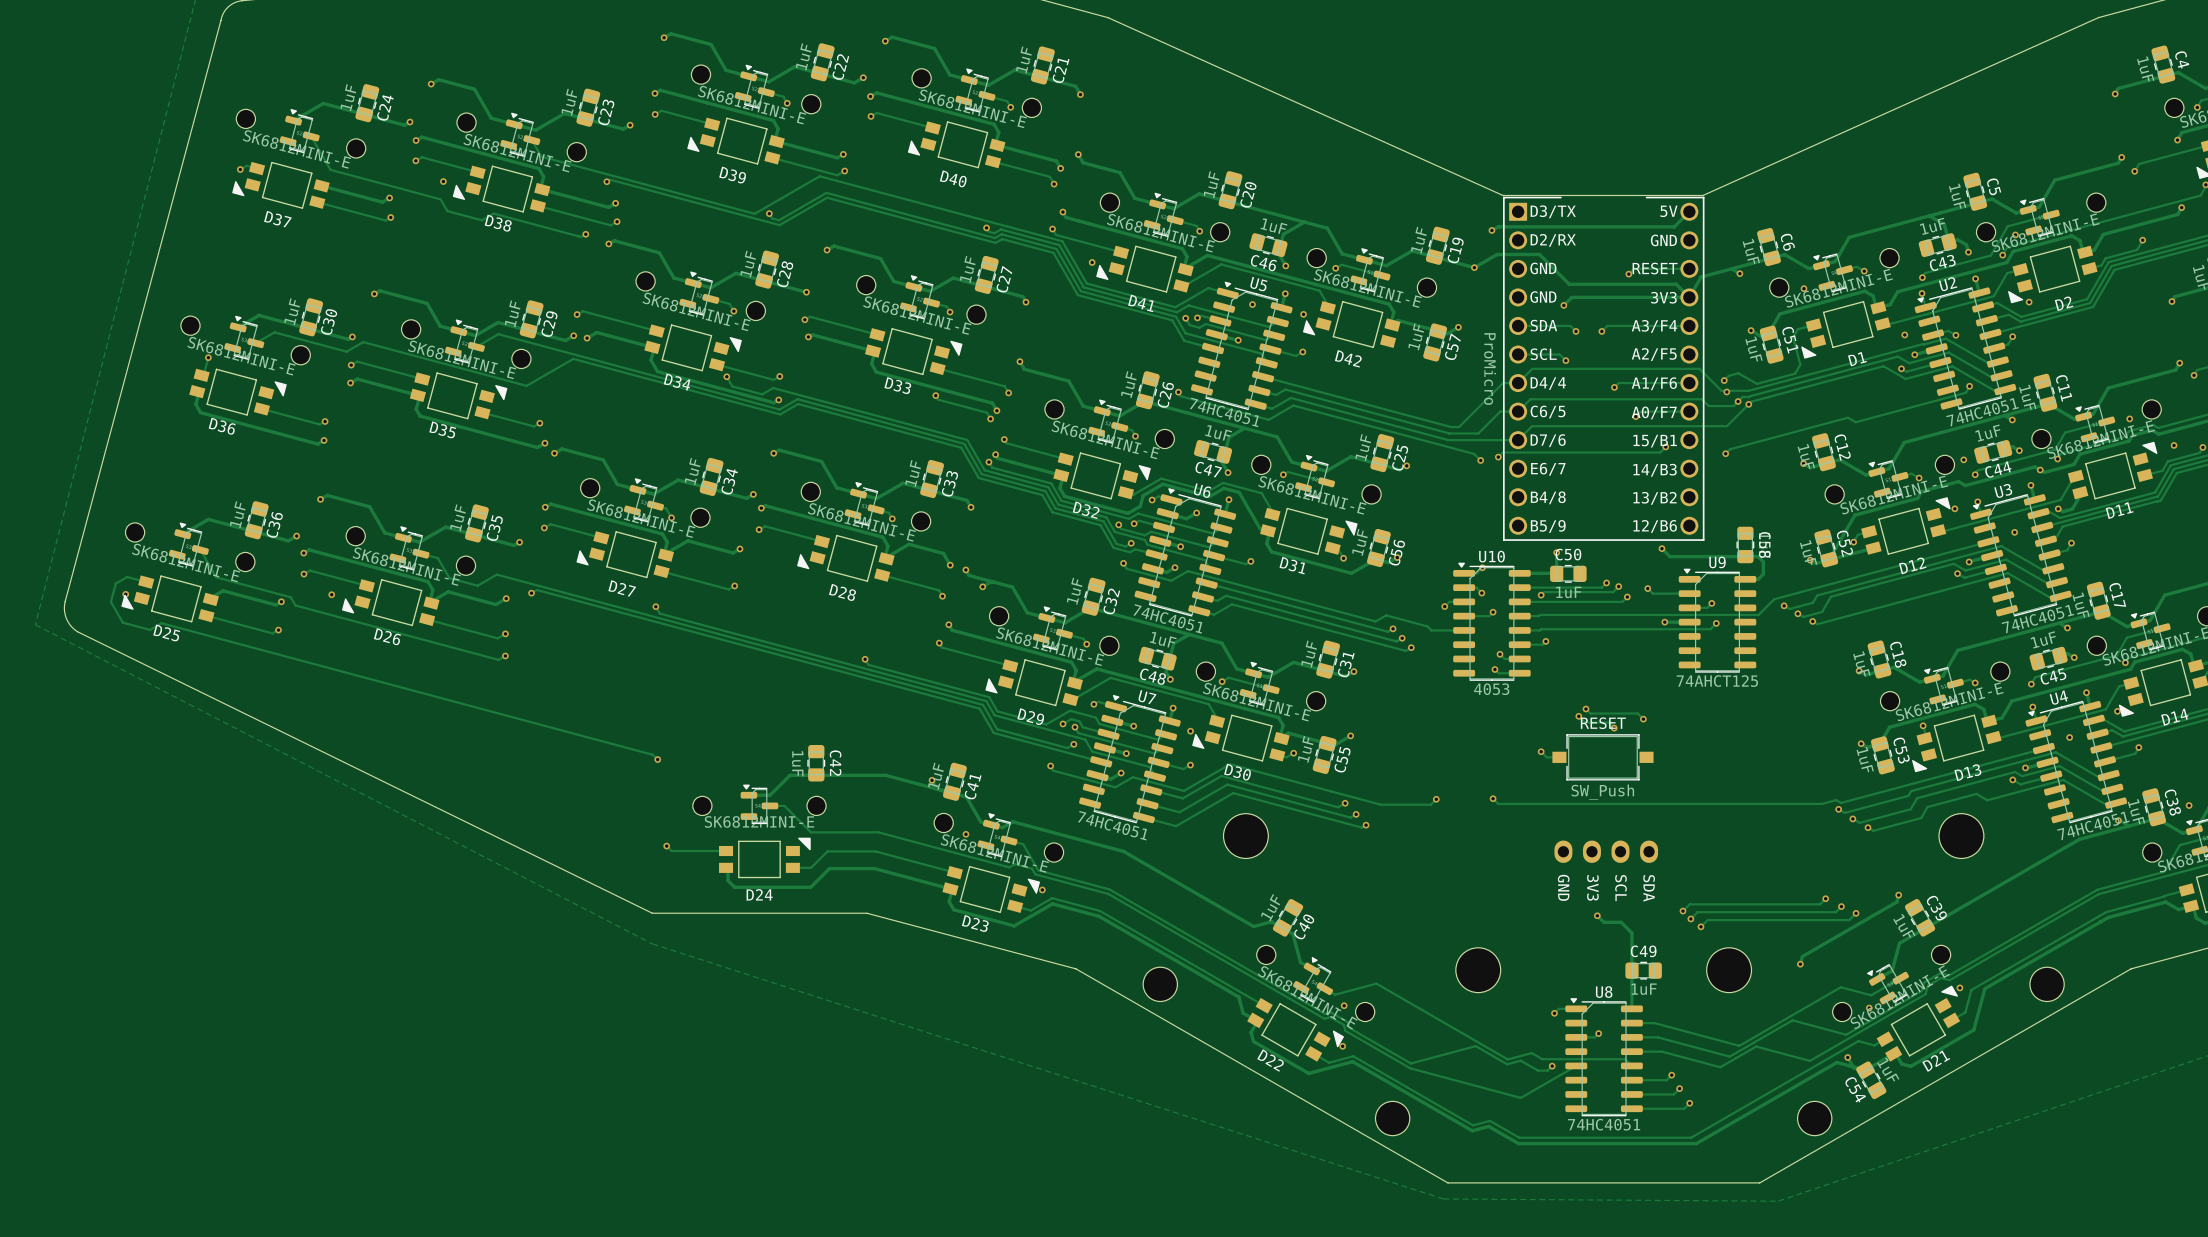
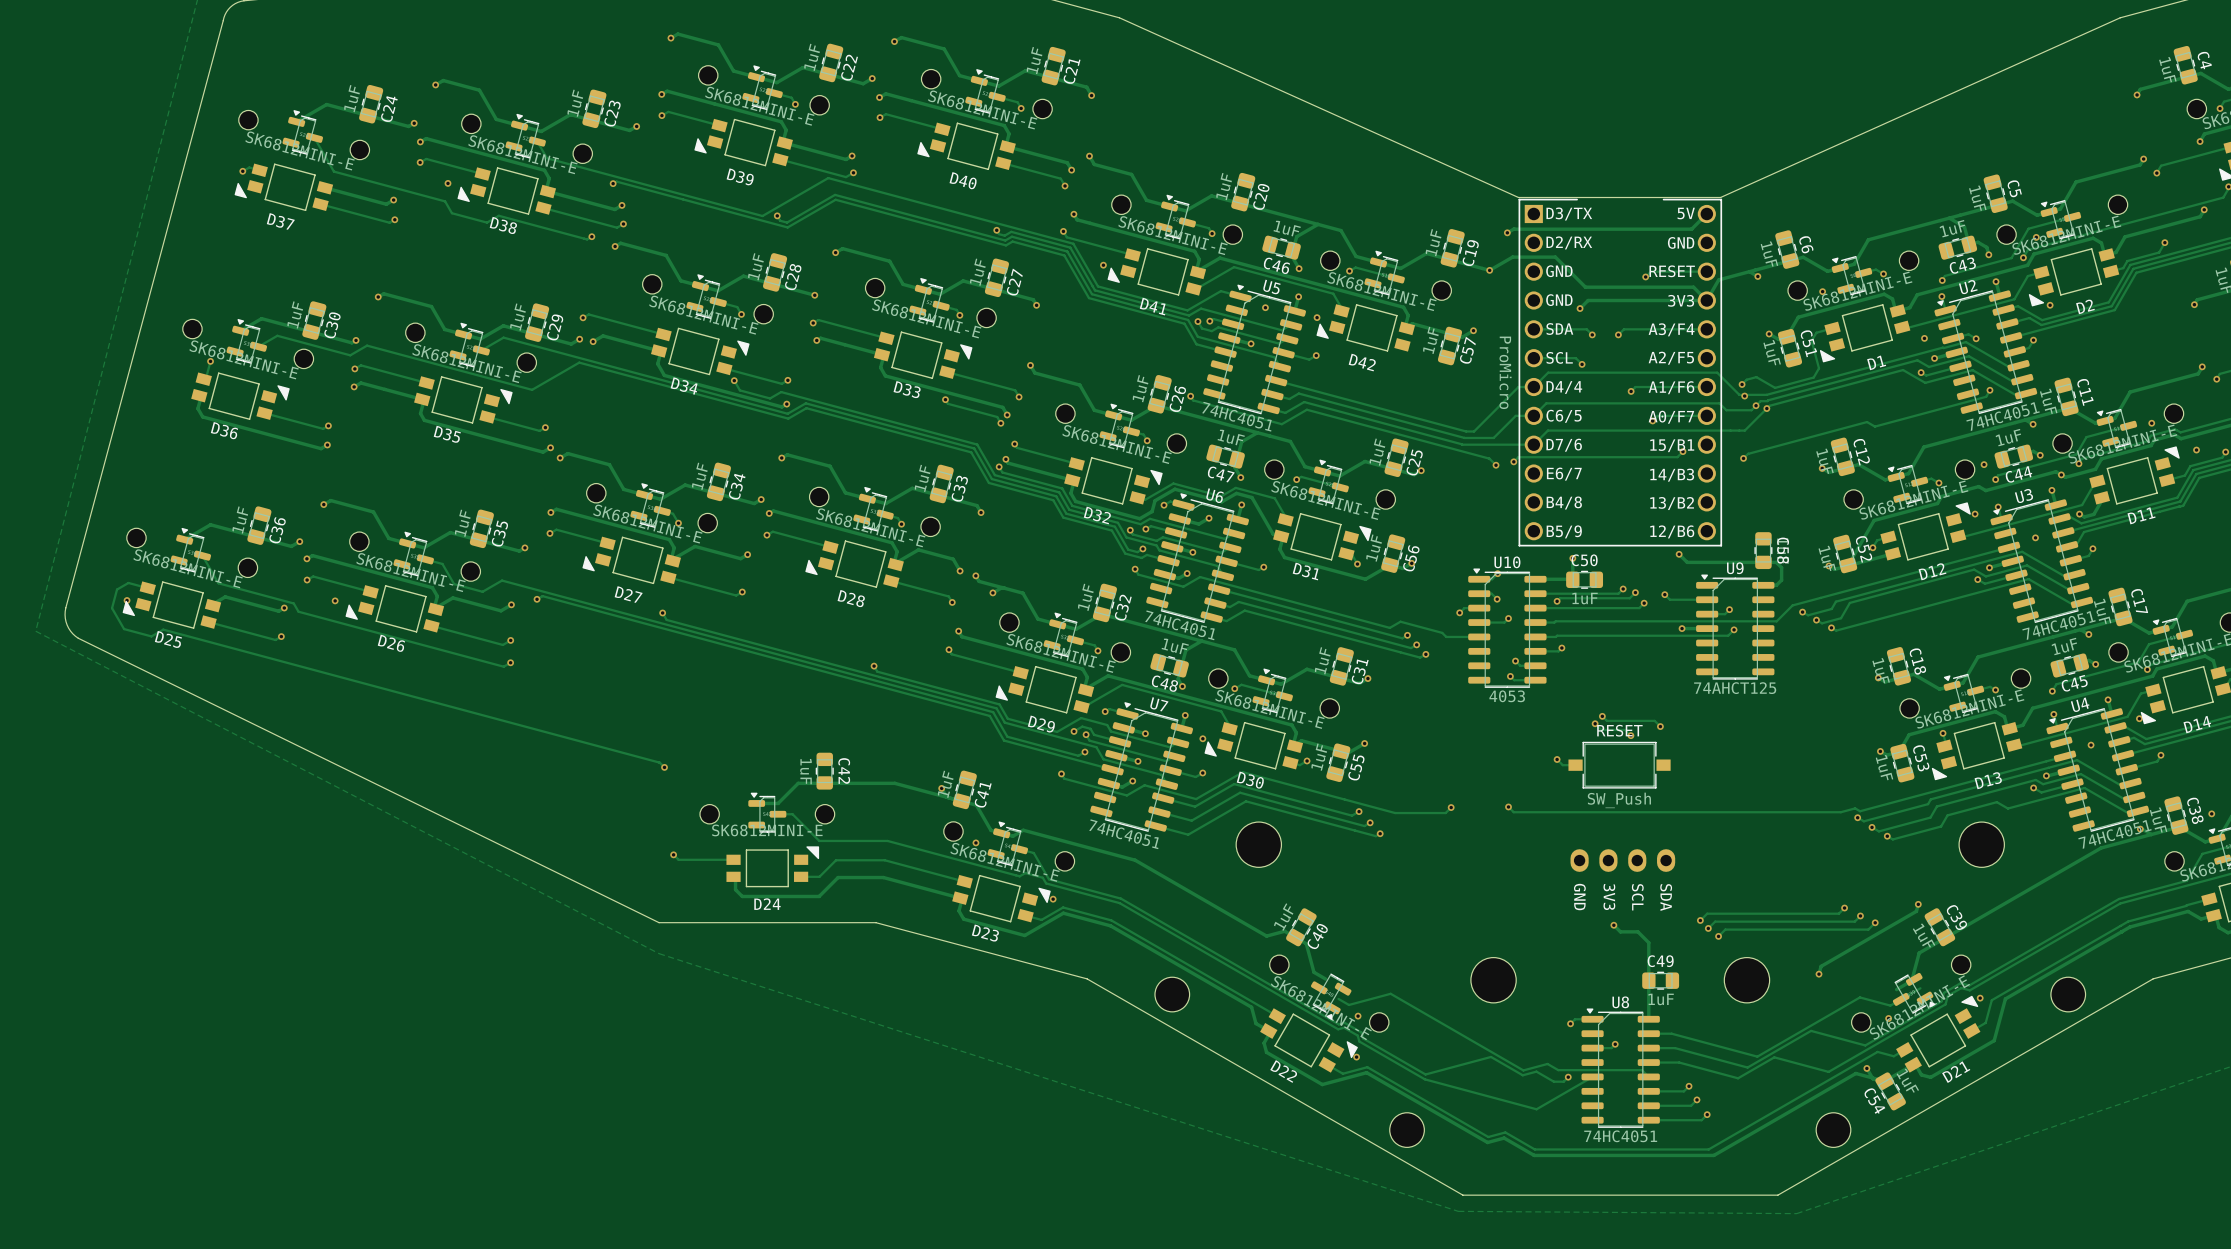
part footprint: [1143, 813, 1501, 1136] -> [1154, 822, 1517, 1148]
part footprint: [1706, 813, 2065, 1136] -> [1724, 822, 2086, 1148]

